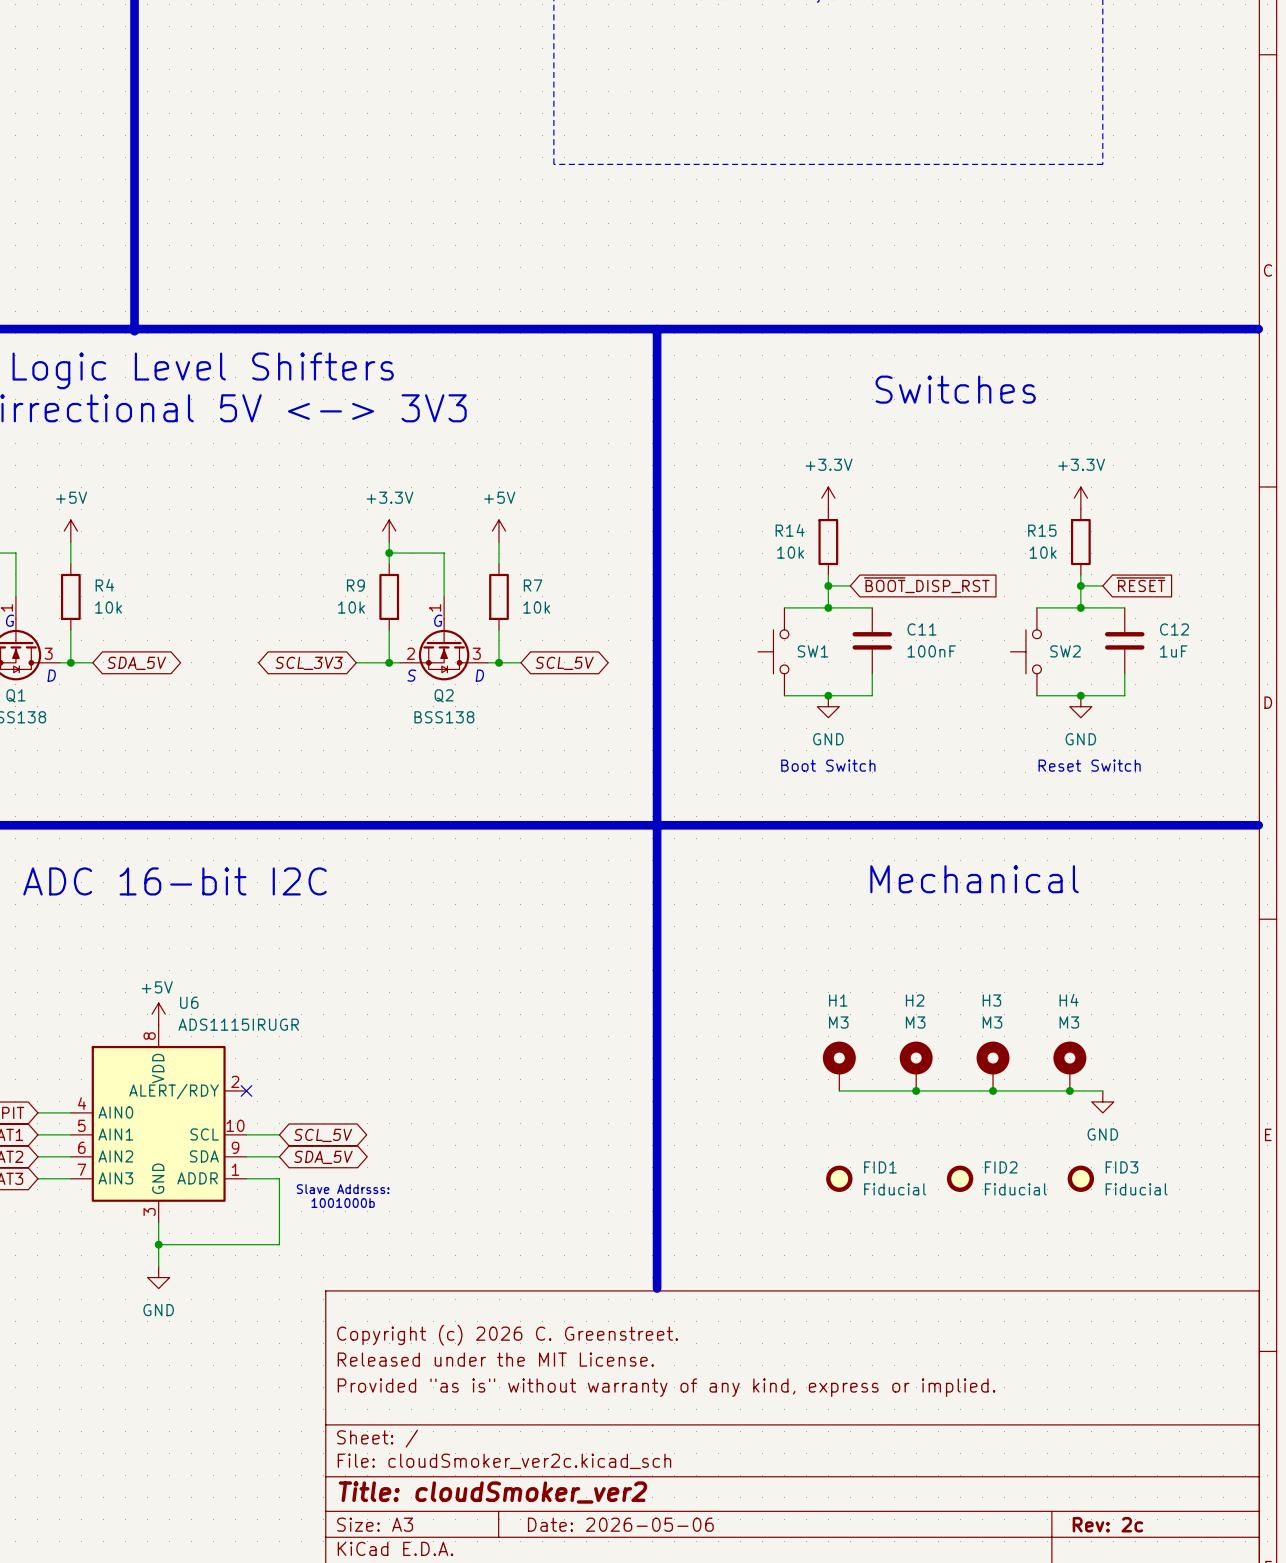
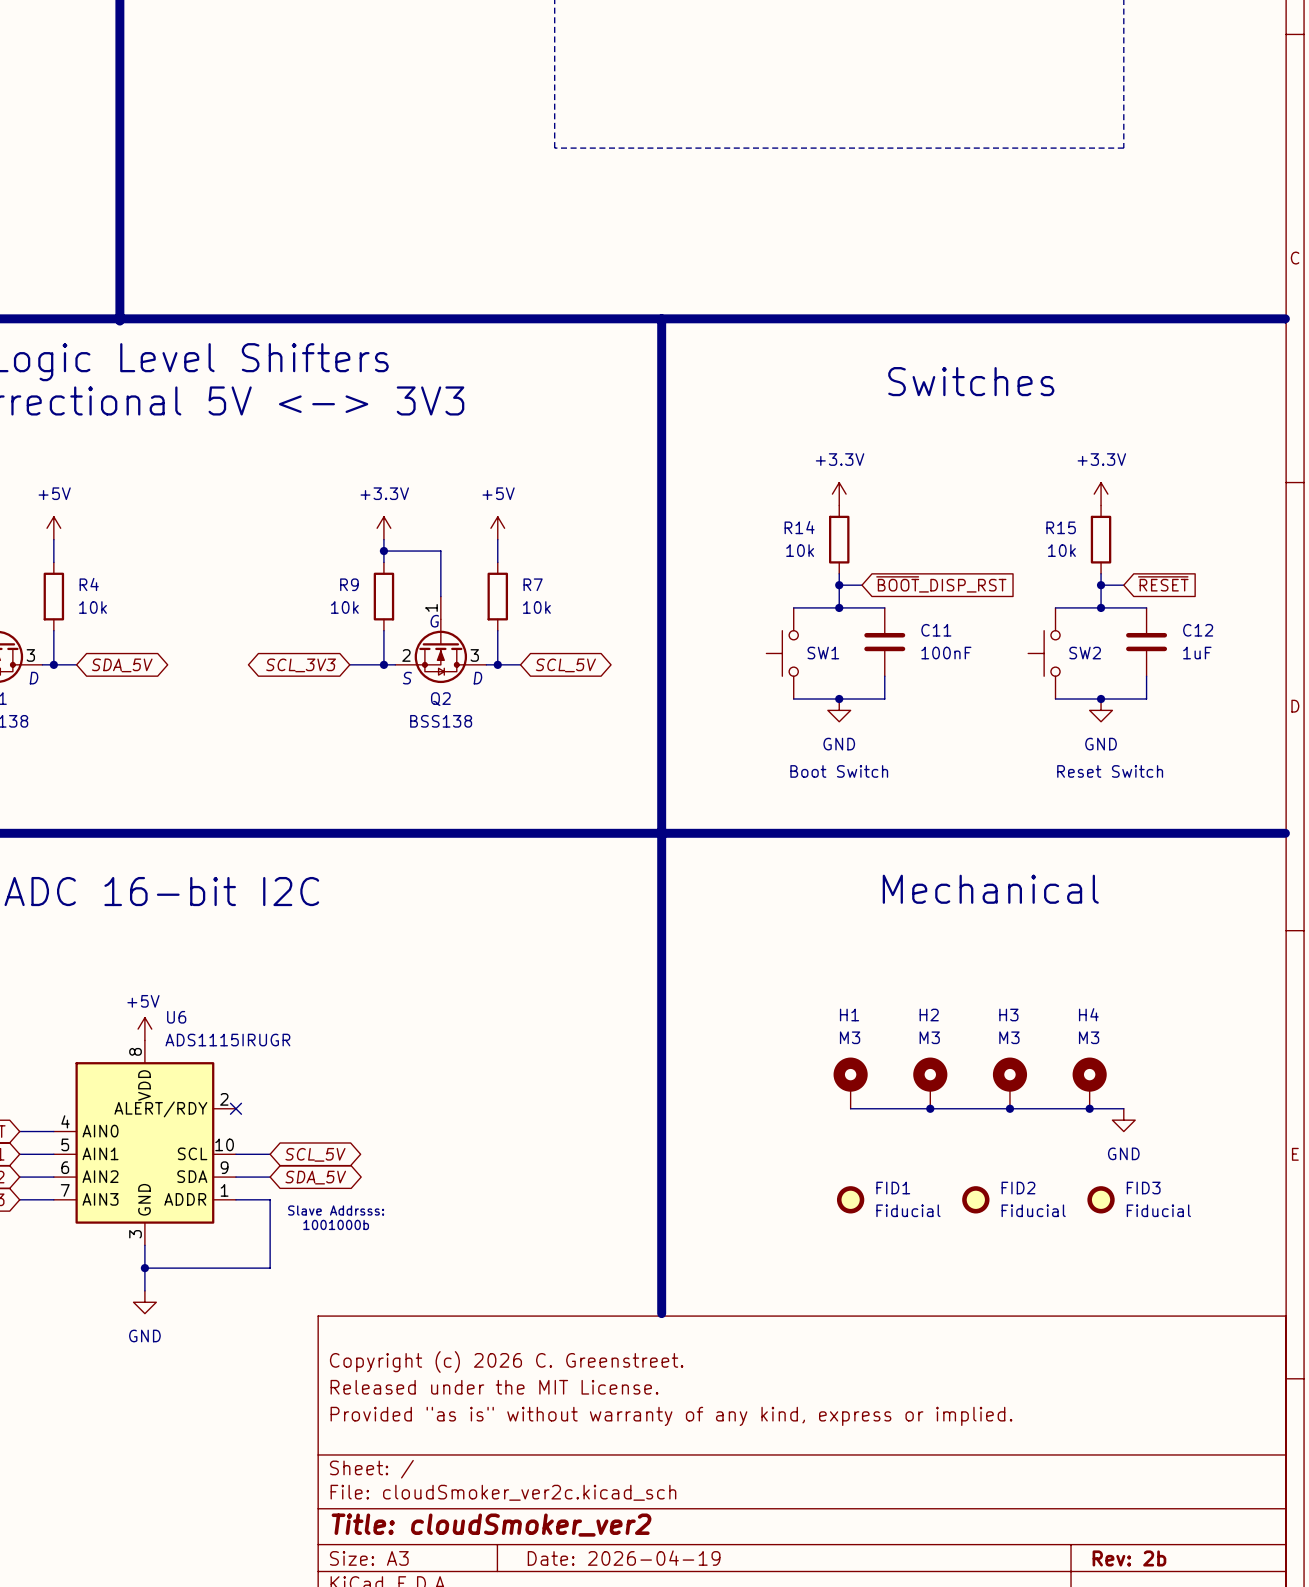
title block: Date: 2026-05-06 (620, 1524) -> Date: 2026-04-19 (624, 1558)
title block: Rev: 2c (1107, 1524) -> Rev: 2b (1129, 1558)

